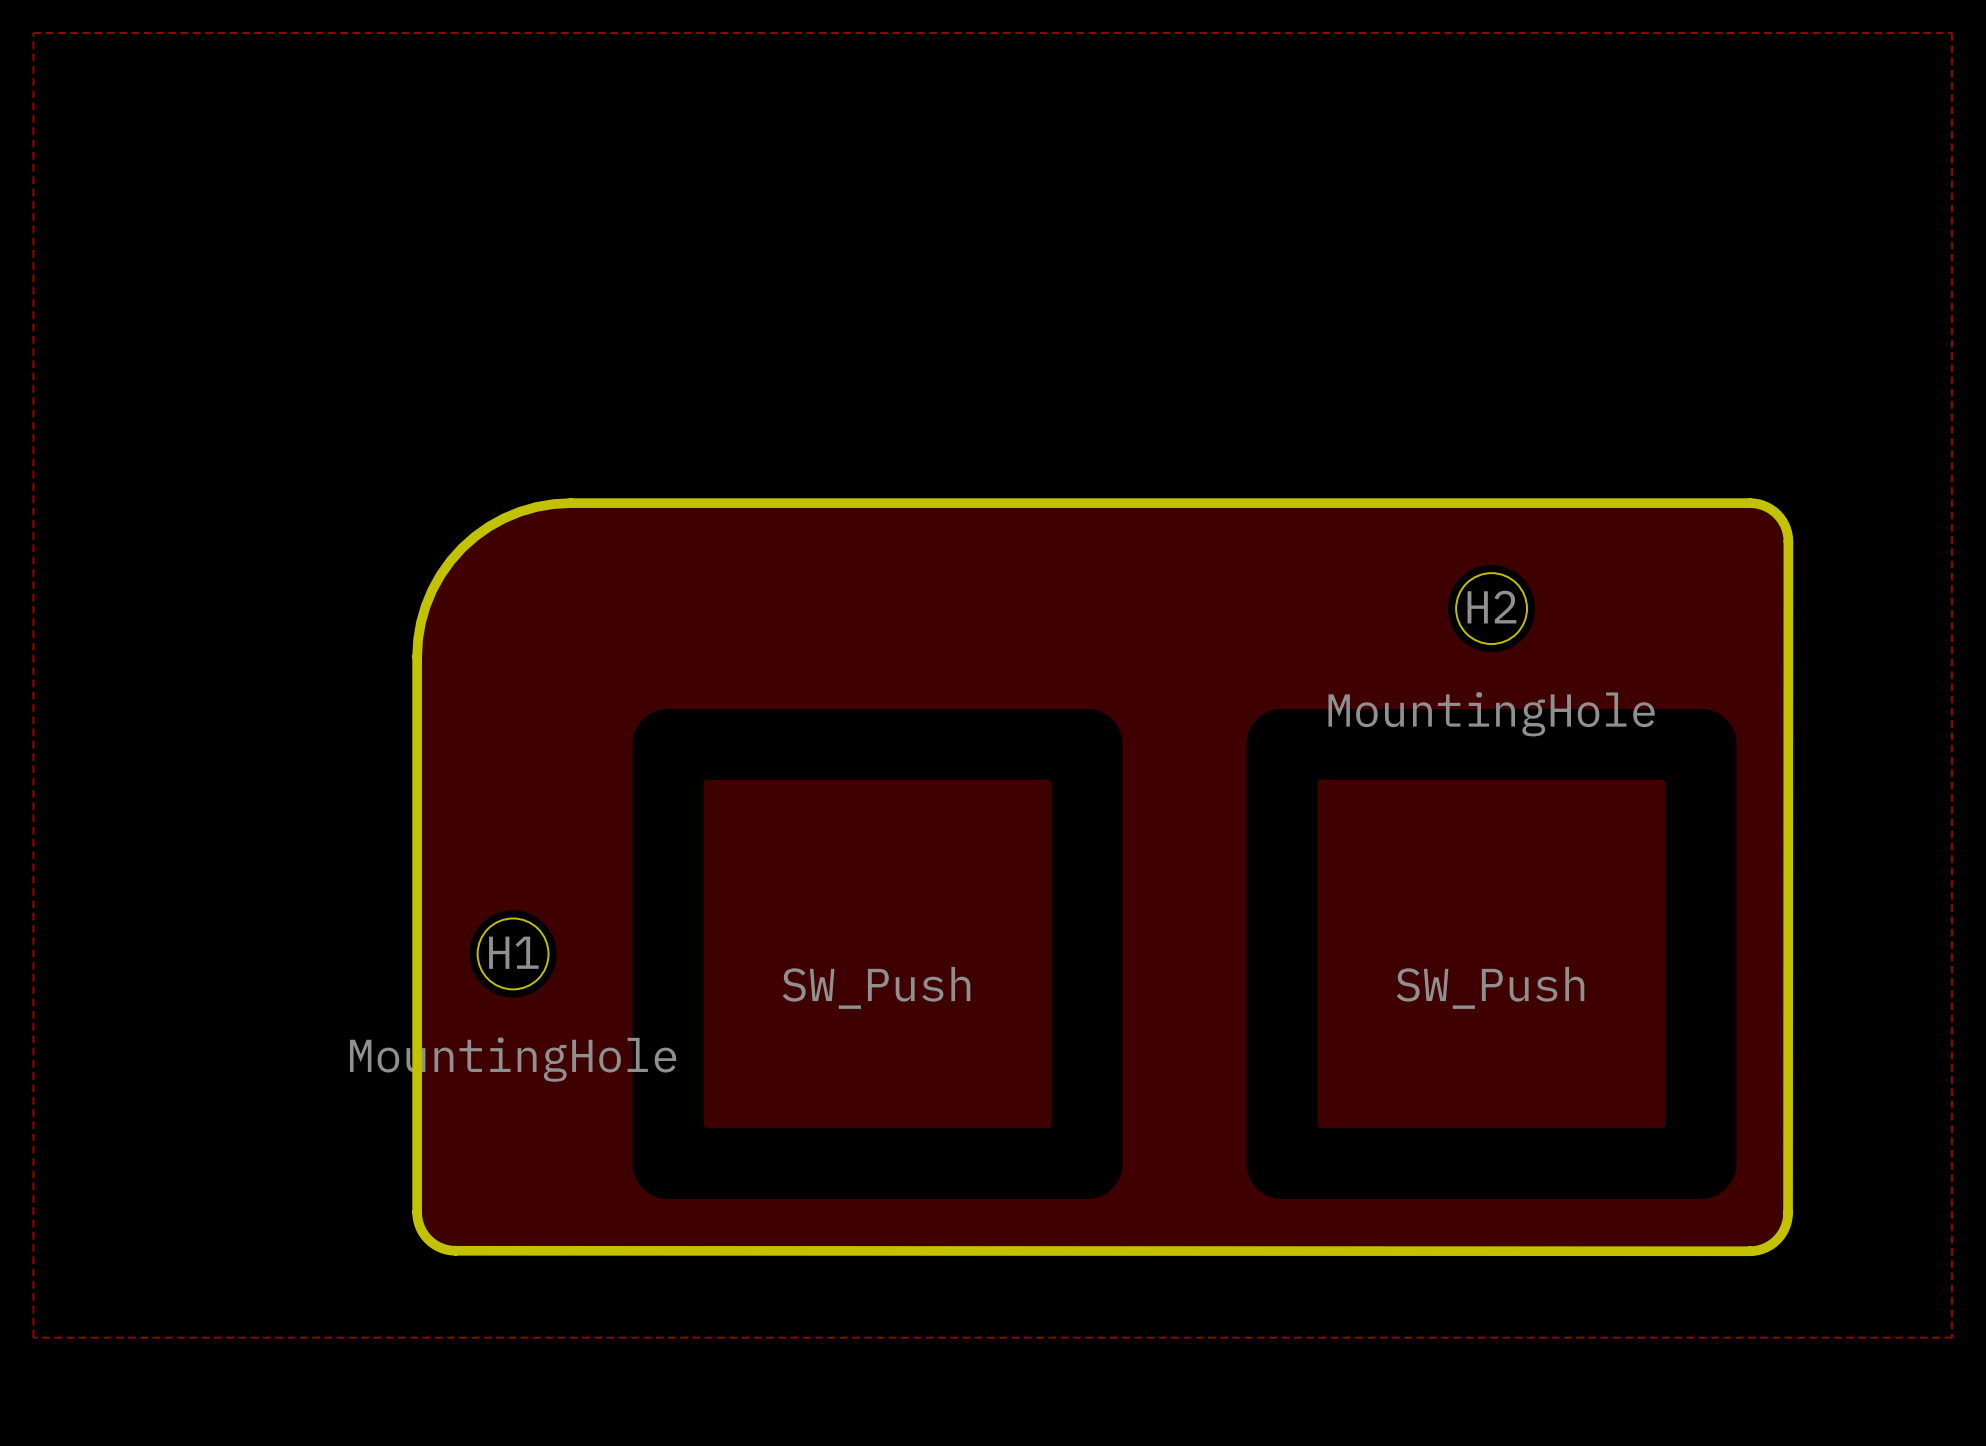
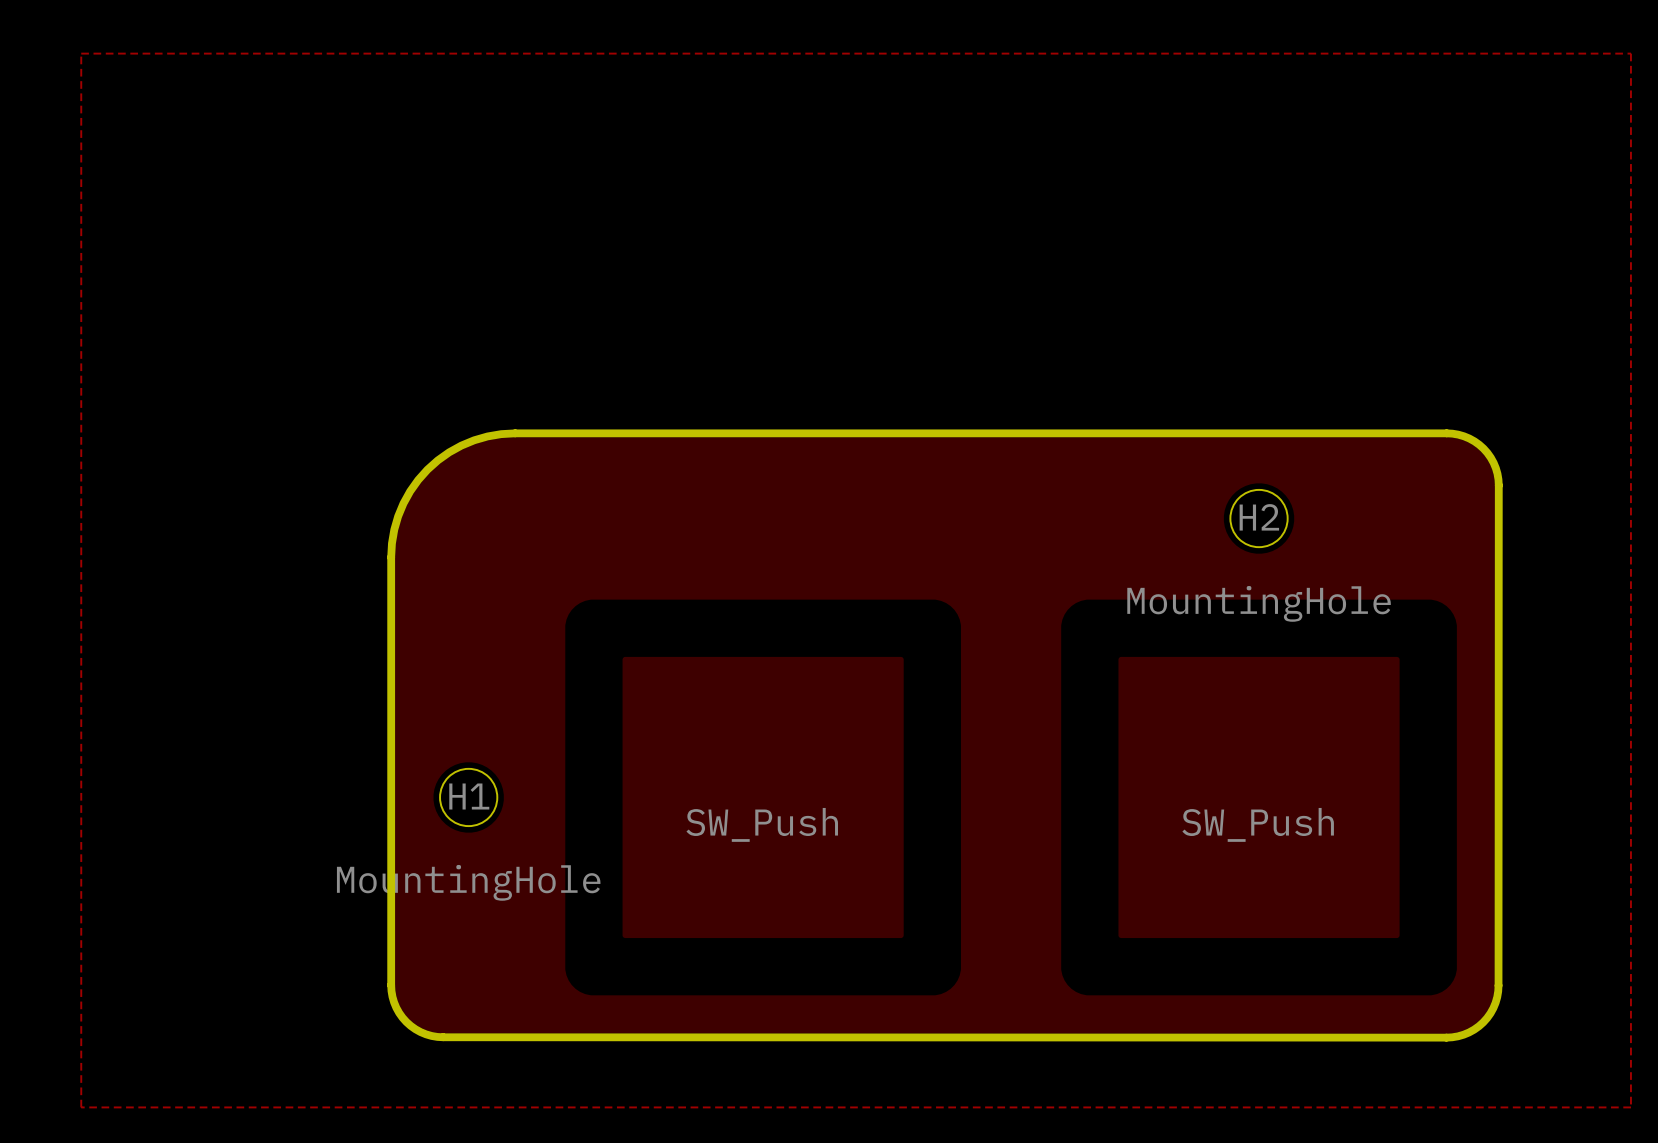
drawing shape: [412, 498, 1794, 1257] -> [387, 429, 1503, 1042]

